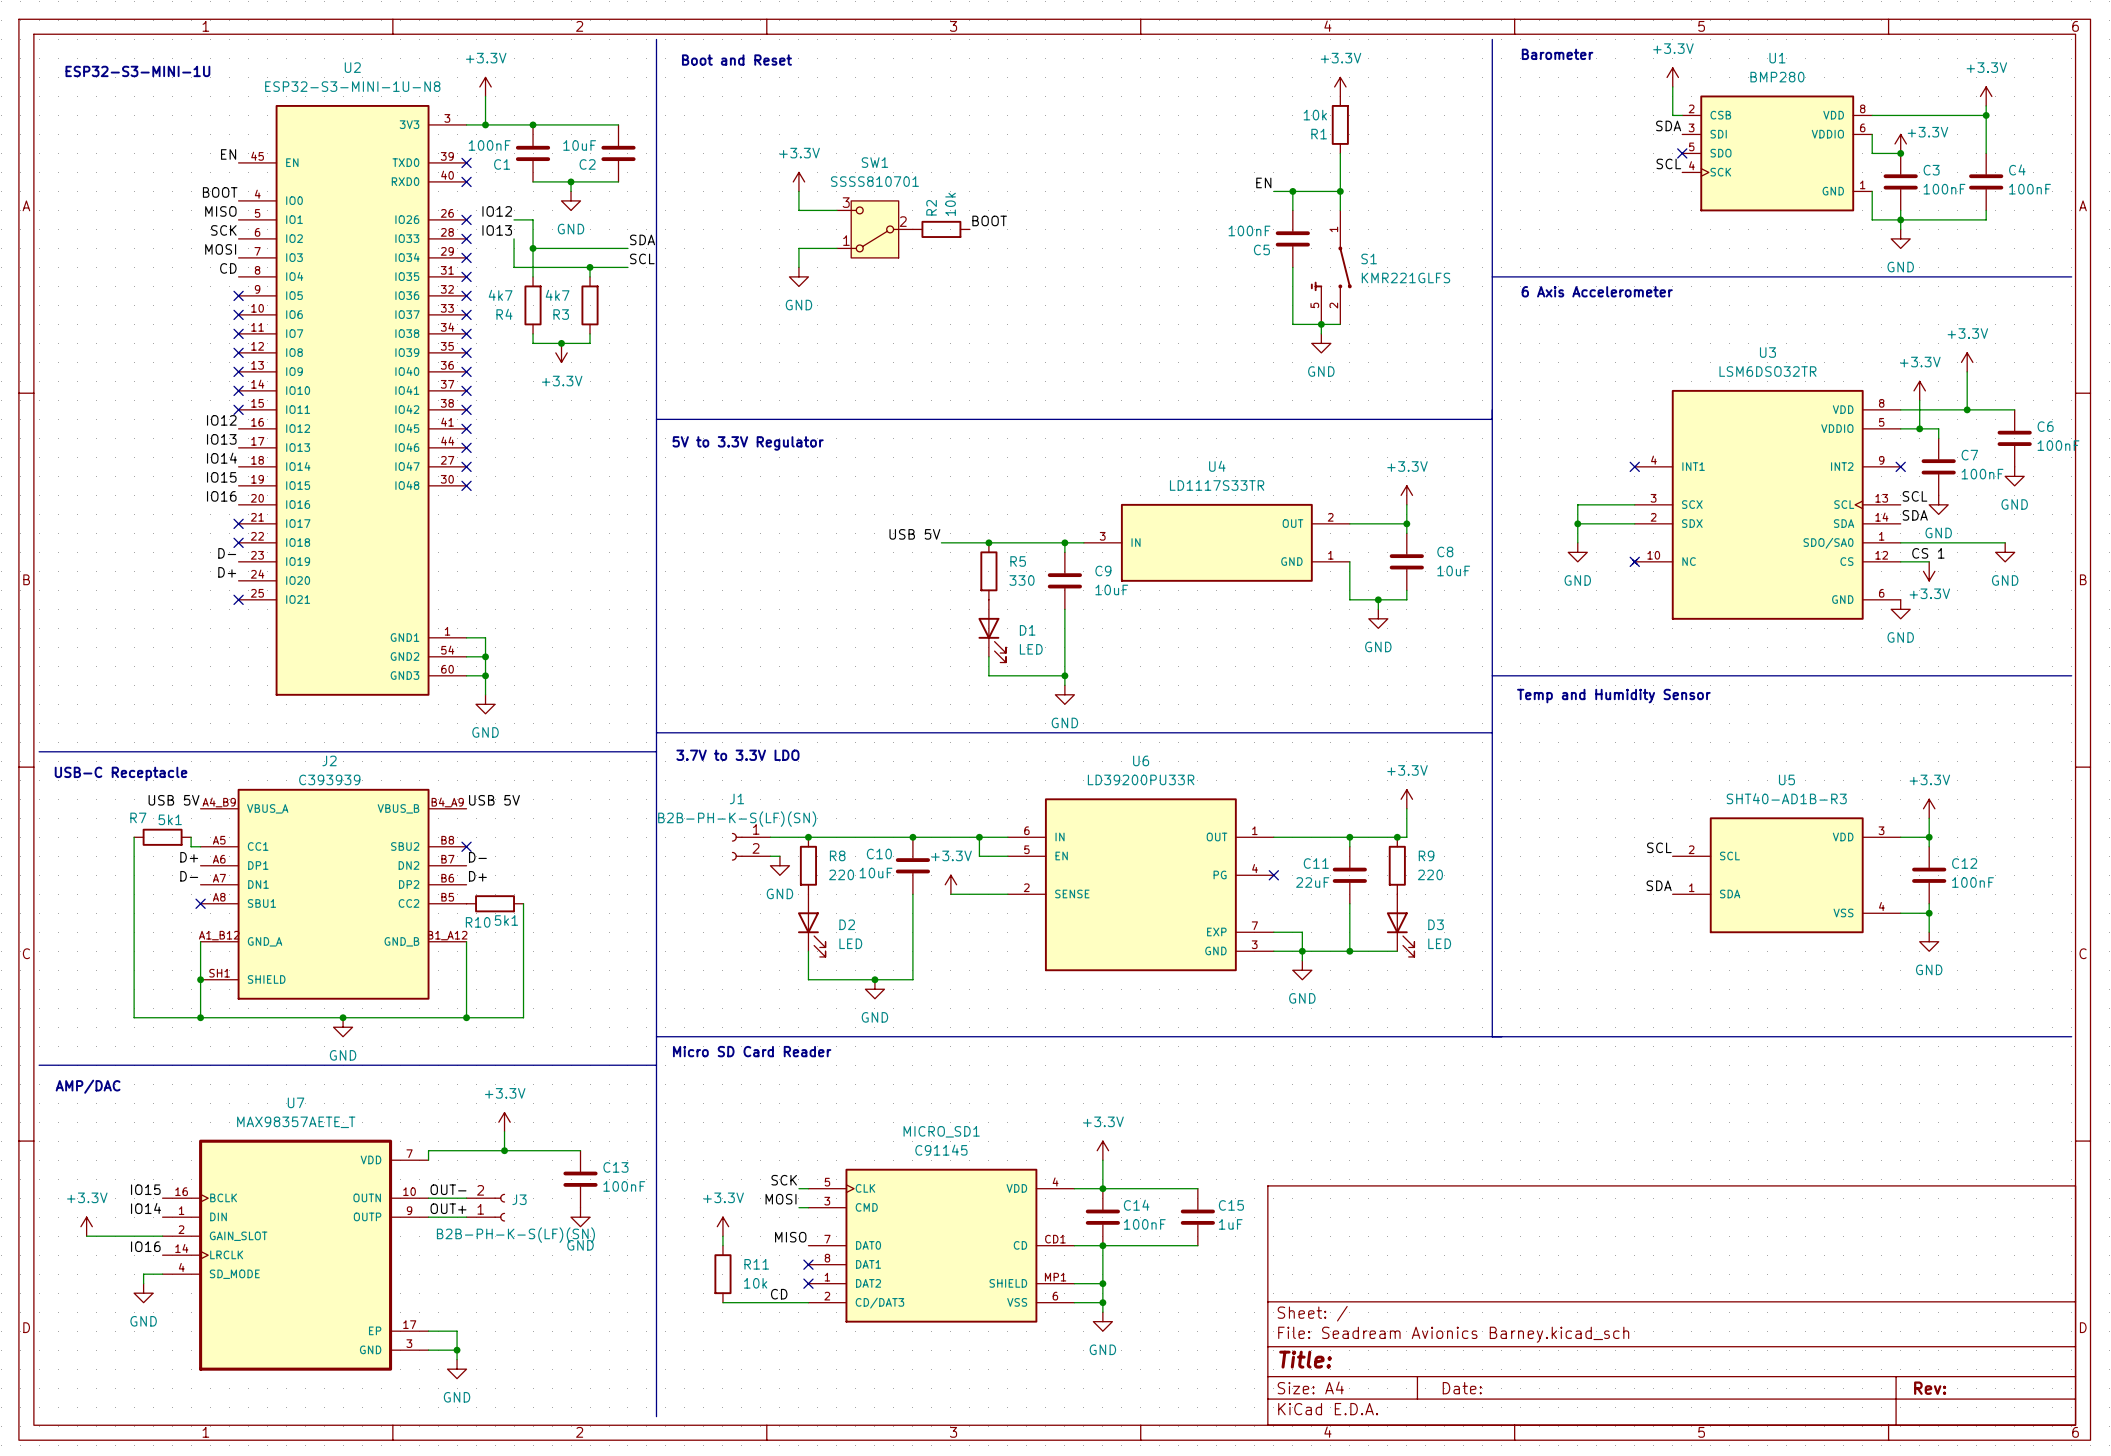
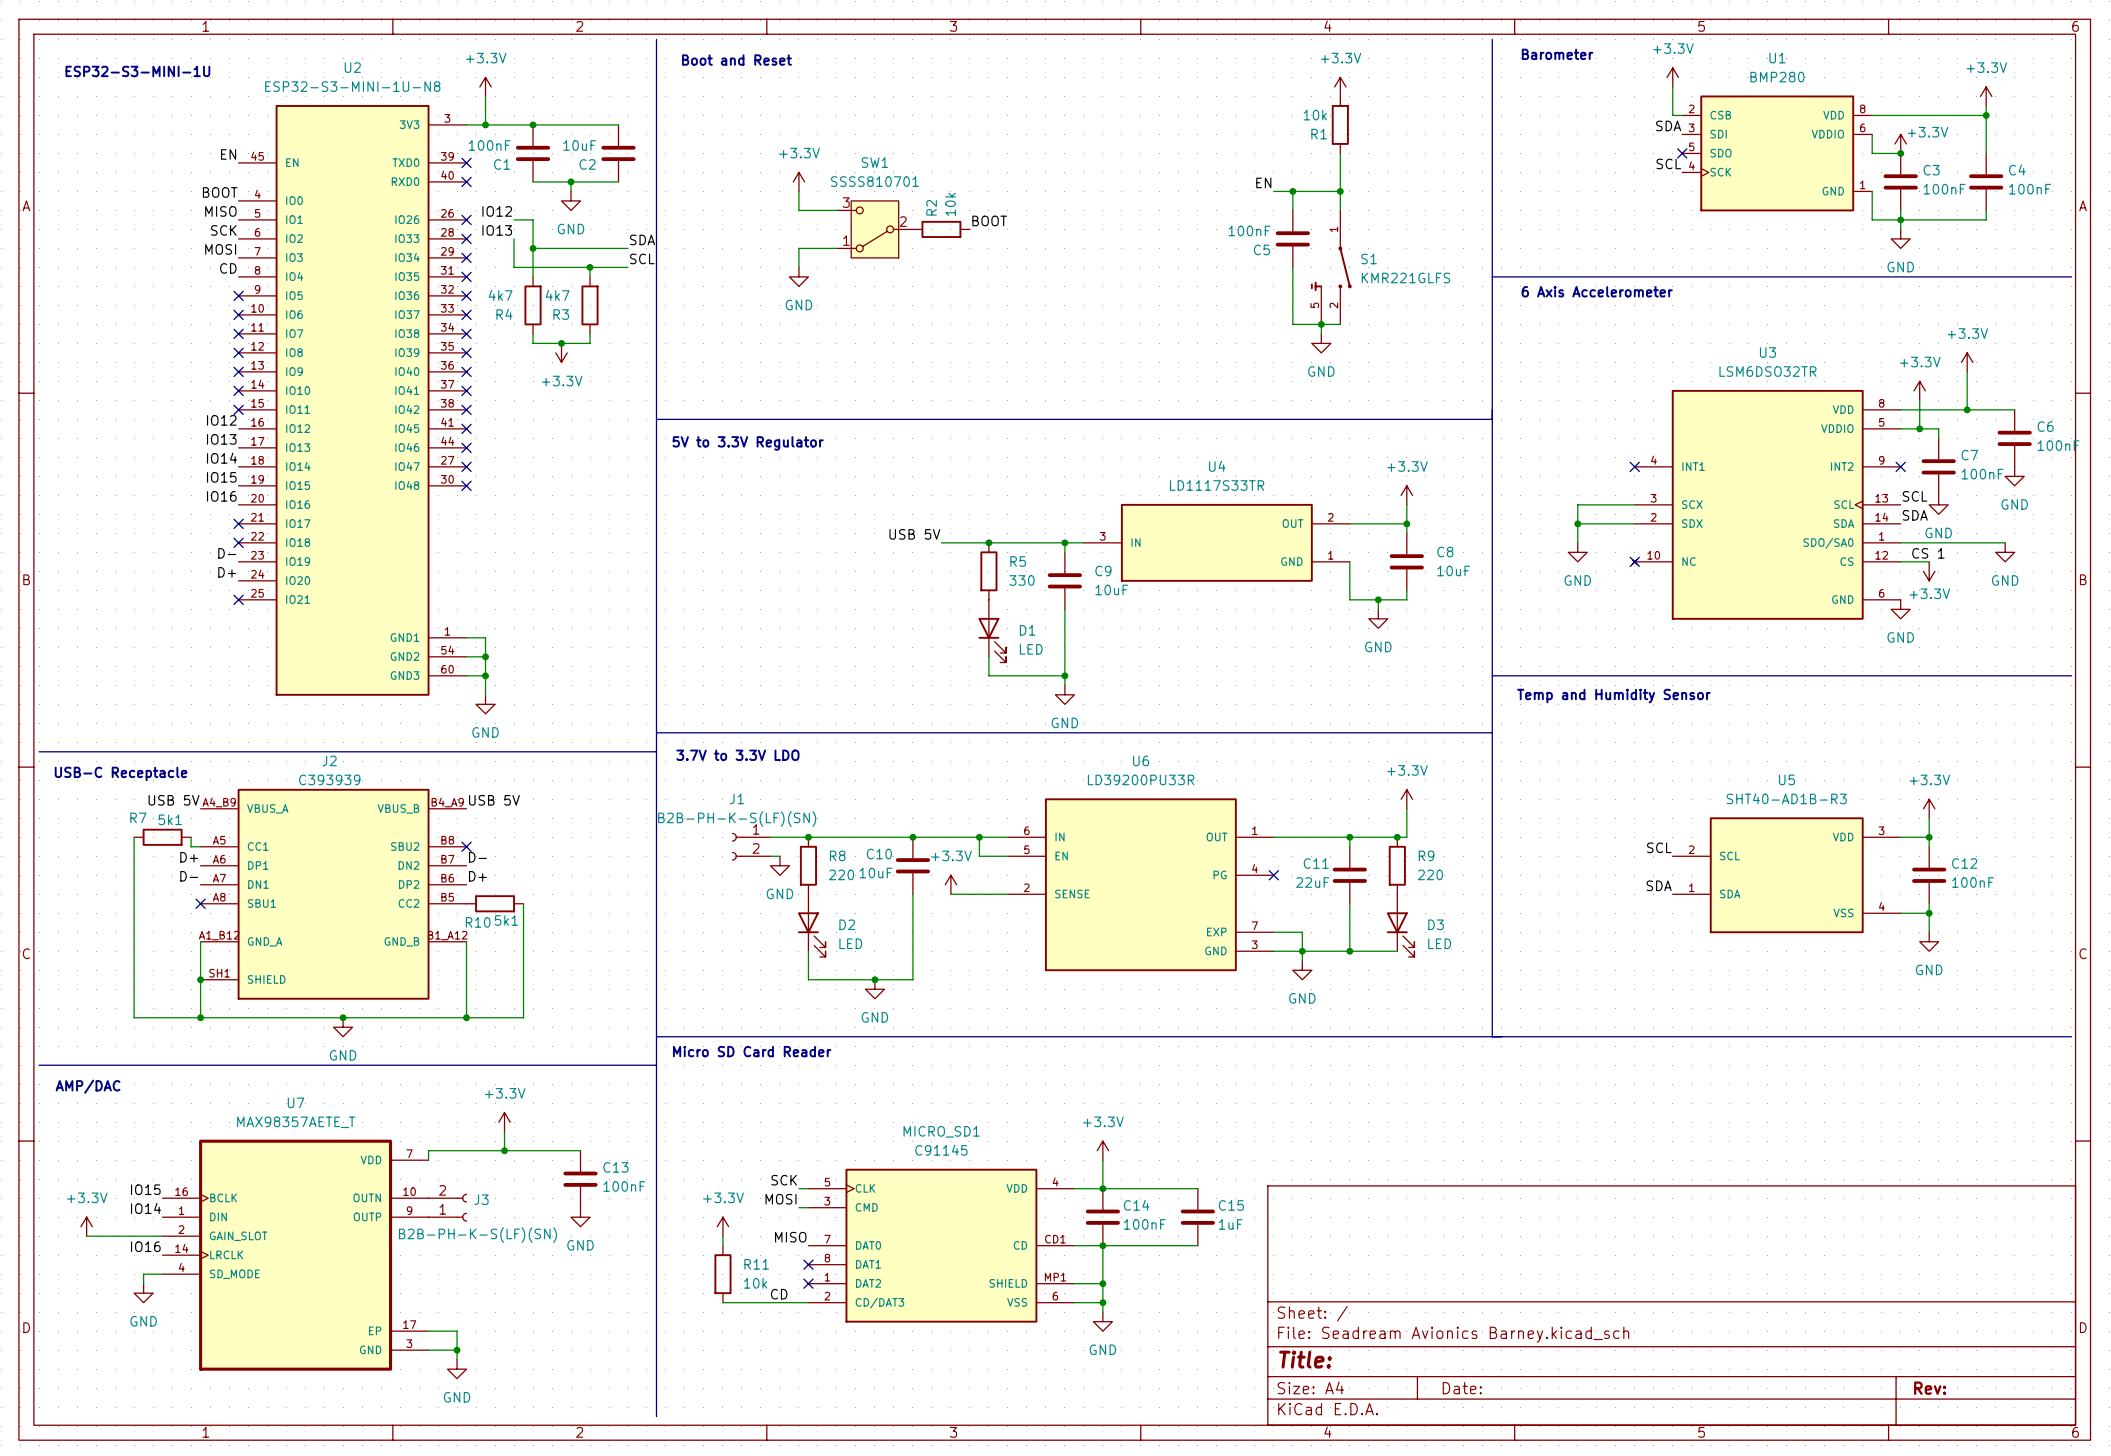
label: OUT- (448, 1189) -> none
J3 position: (485, 1207) -> (447, 1207)
label: OUT+ (448, 1208) -> none

